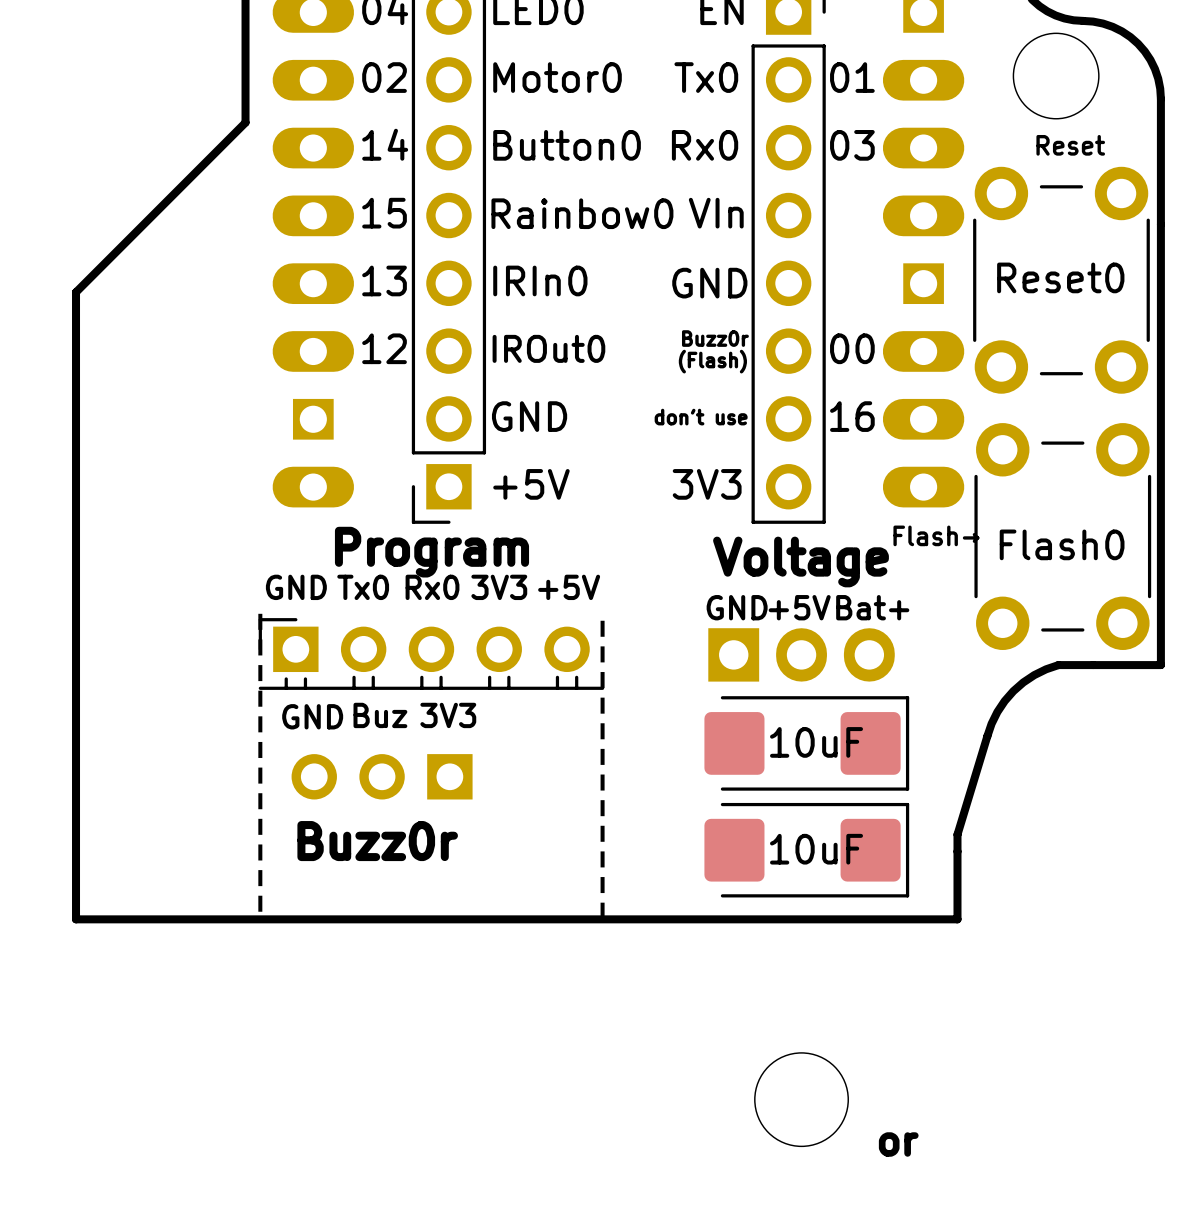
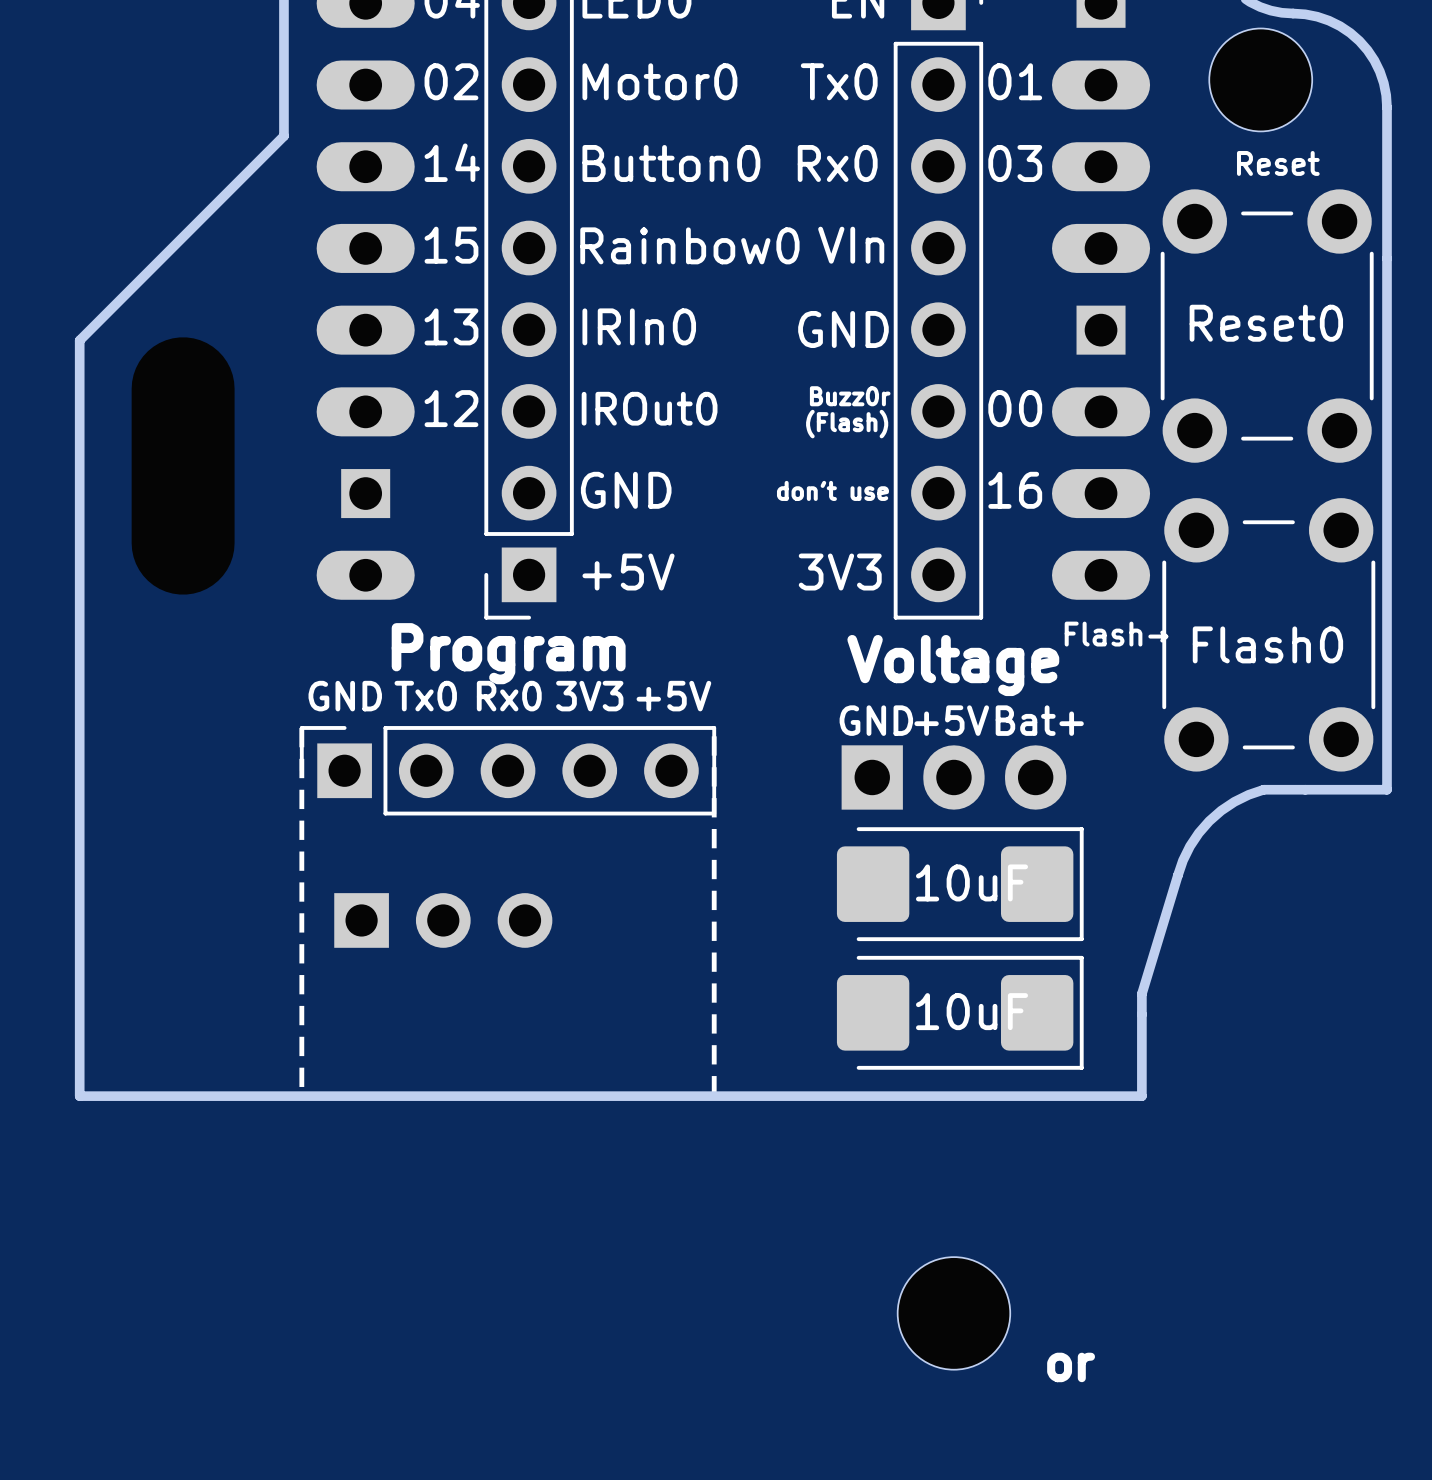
part footprint: [258, 618, 605, 690] -> [299, 726, 717, 816]
text: Buz (380, 715) -> none
text: 3V3 (448, 715) -> none
text: GND (312, 716) -> none
part rotation: 0° (382, 776) -> 180° (443, 920)
text: Buzz0r (377, 841) -> none

